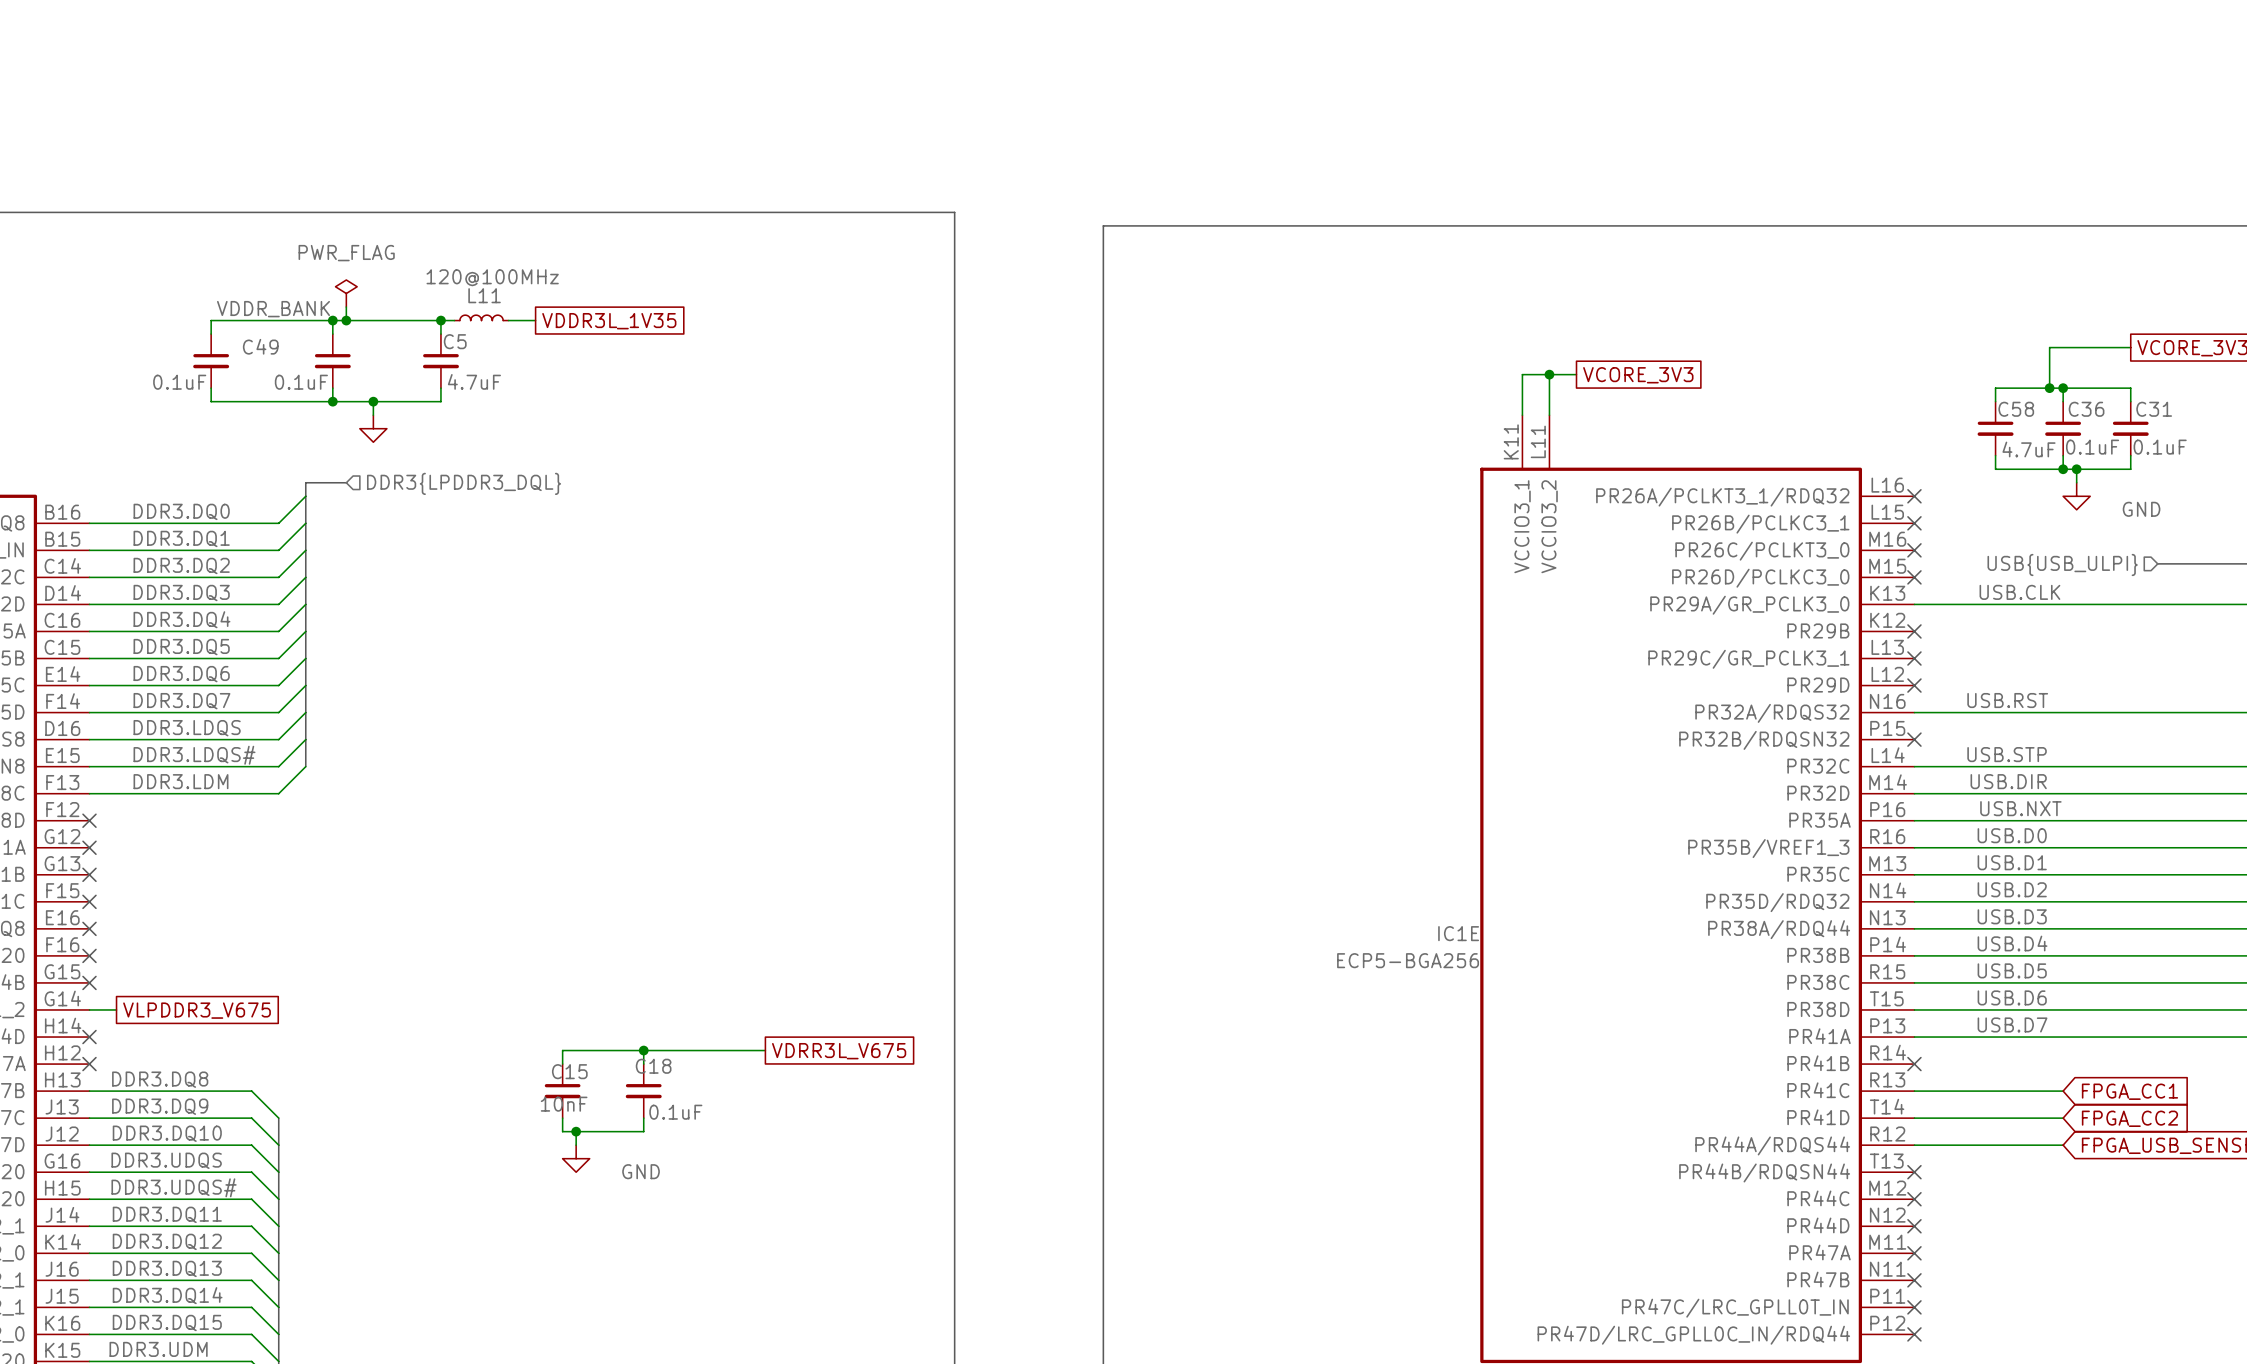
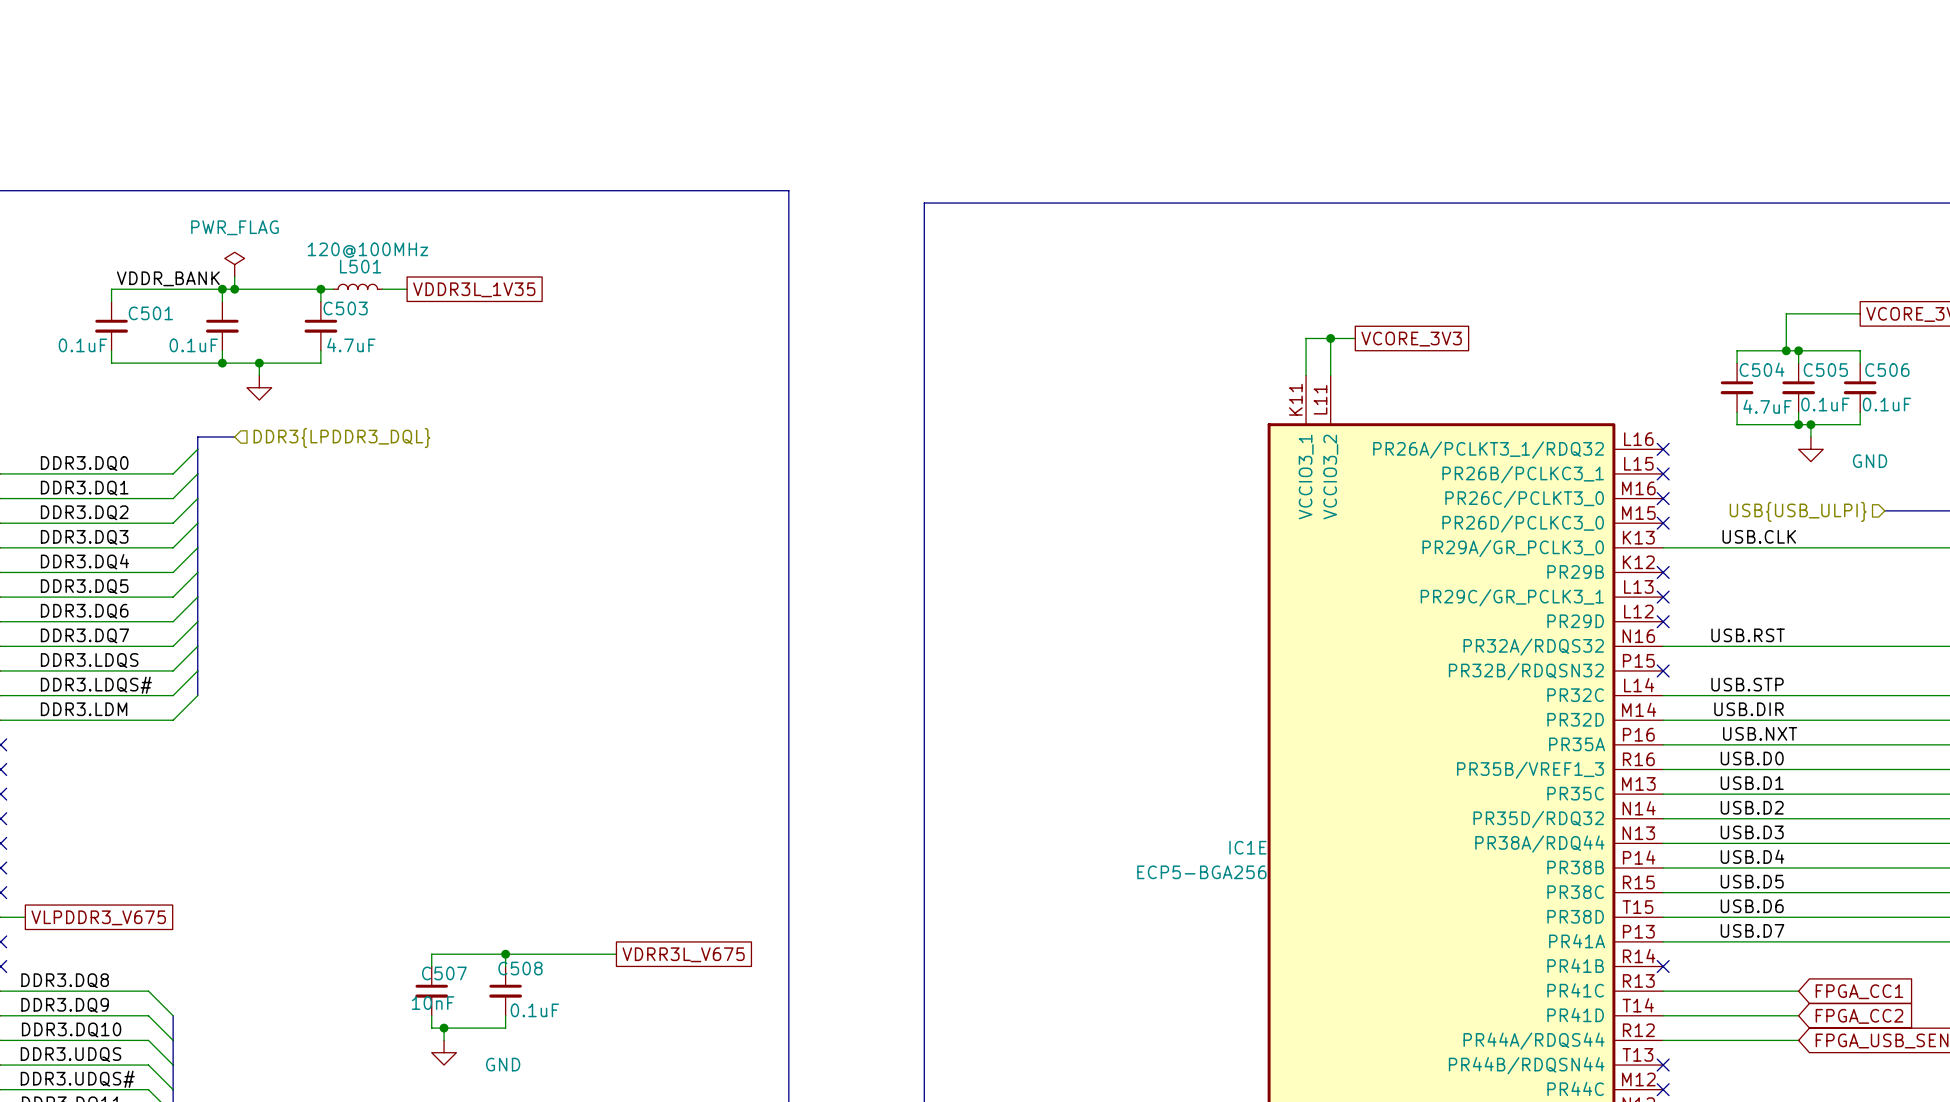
L11 name: L11 (484, 295) -> L501 (360, 266)
C5 name: C5 (455, 341) -> C503 (345, 308)
C49 name: C49 (260, 346) -> C501 (150, 313)
C58 name: C58 (2016, 409) -> C504 (1762, 369)
C36 name: C36 (2086, 409) -> C505 (1825, 370)
C31 name: C31 (2154, 409) -> C506 (1887, 370)
C18 name: C18 (653, 1066) -> C508 (520, 968)
C15 name: C15 (569, 1071) -> C507 (444, 973)

